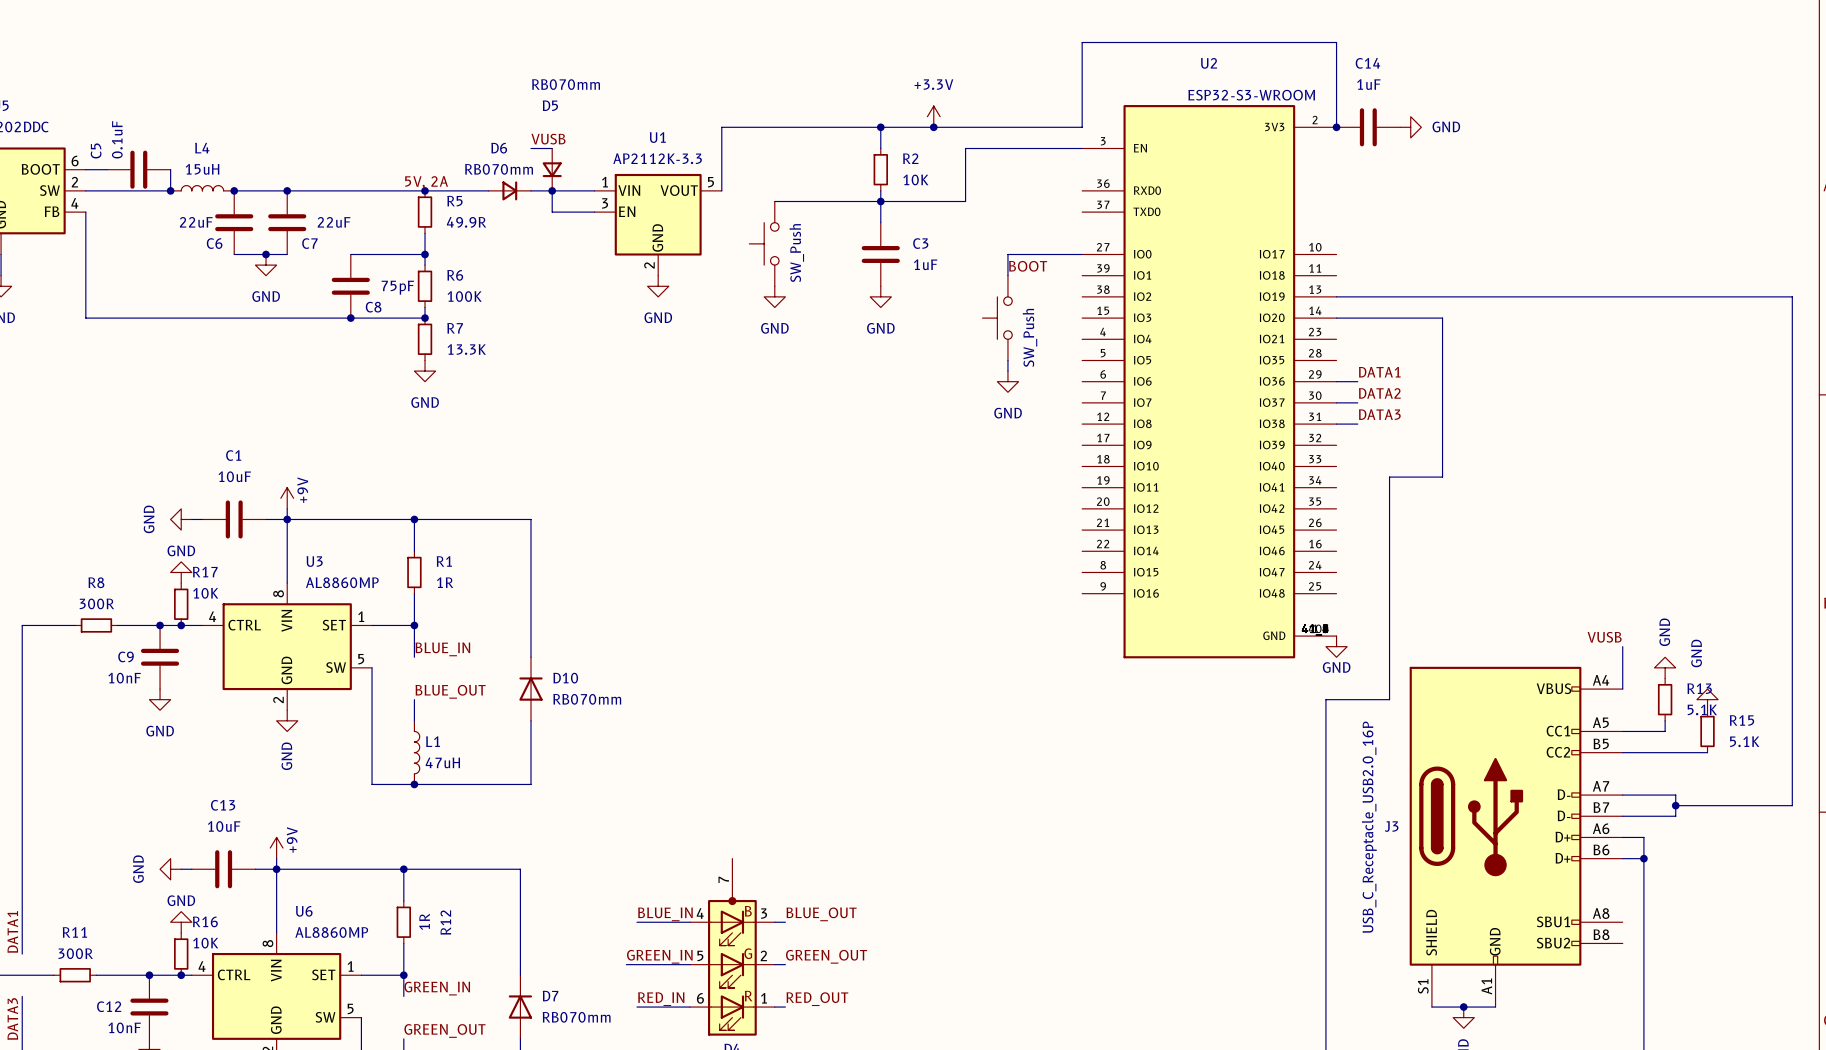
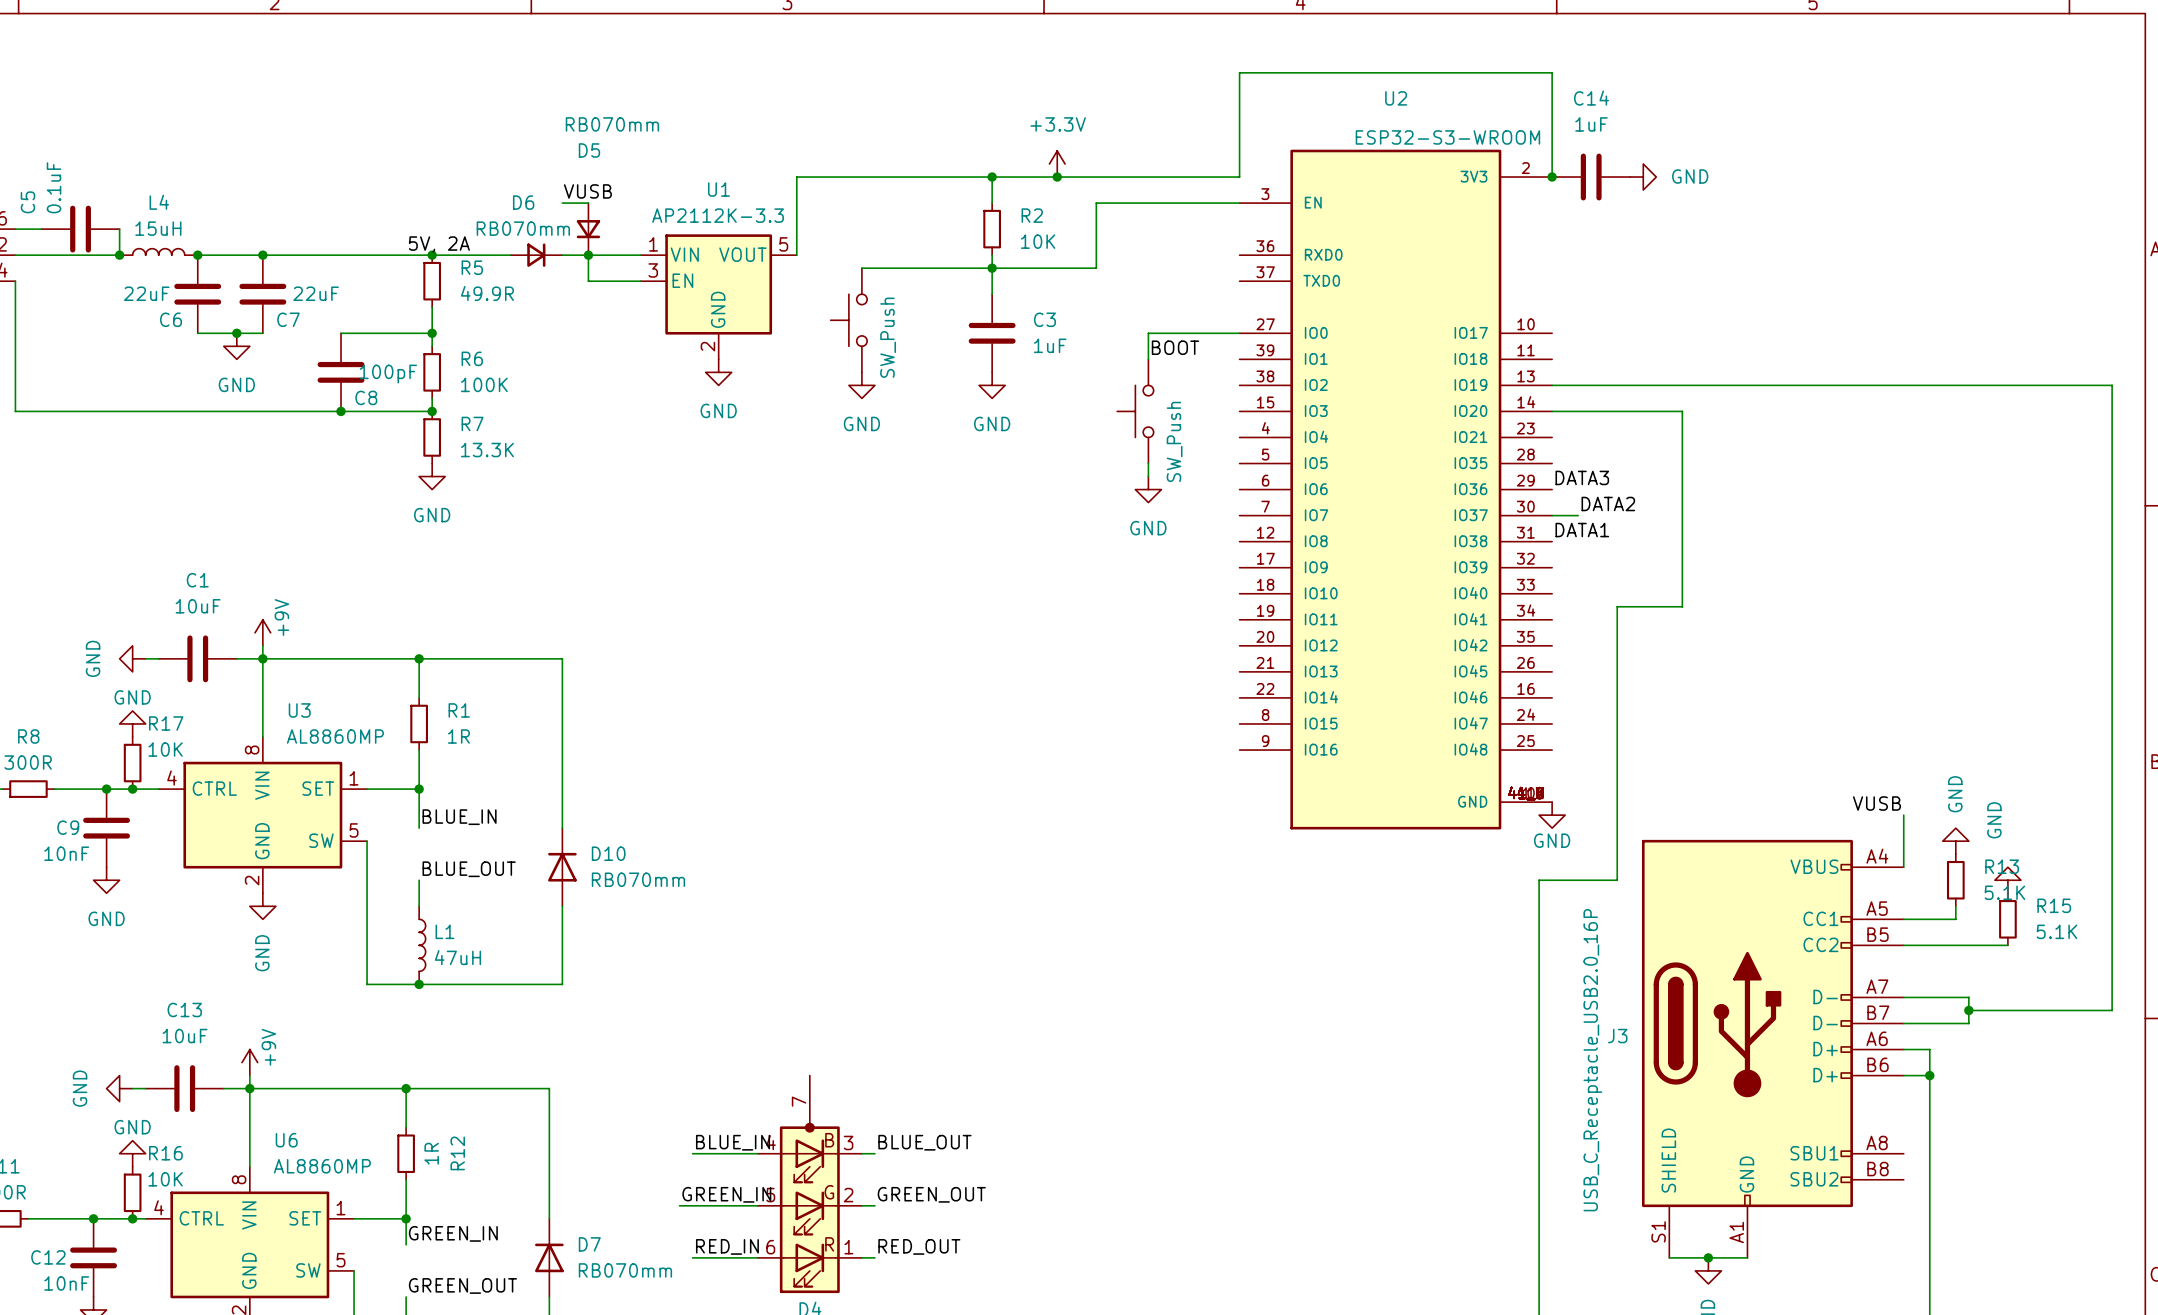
U2 symbol: [1082, 105, 1337, 659] -> [1239, 149, 1553, 830]
C8 value: 75pF (397, 287) -> 100pF (388, 374)
label position: DATA1 (1379, 372) -> DATA1 (1582, 530)
wire: (1336, 381) (1357, 381) -> none
label position: DATA3 (1379, 414) -> DATA3 (1582, 477)
wire: (1336, 424) (1357, 424) -> none

